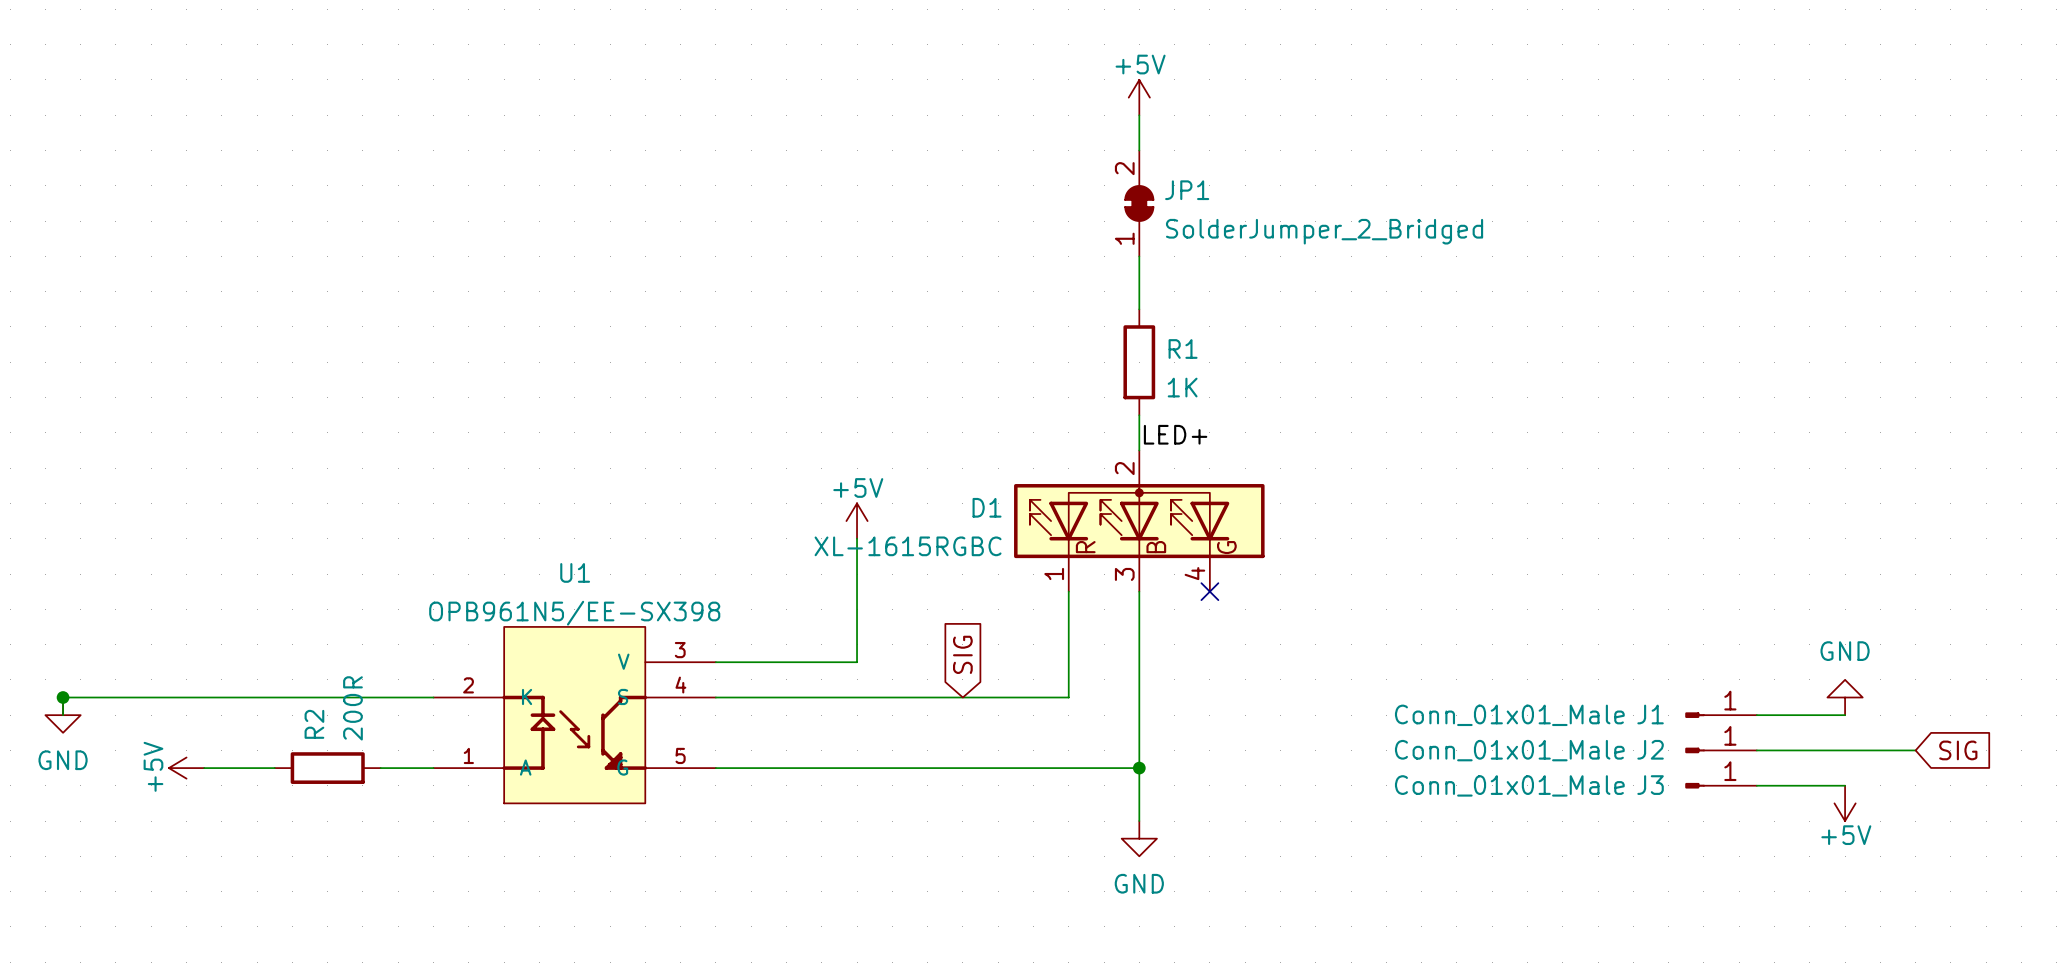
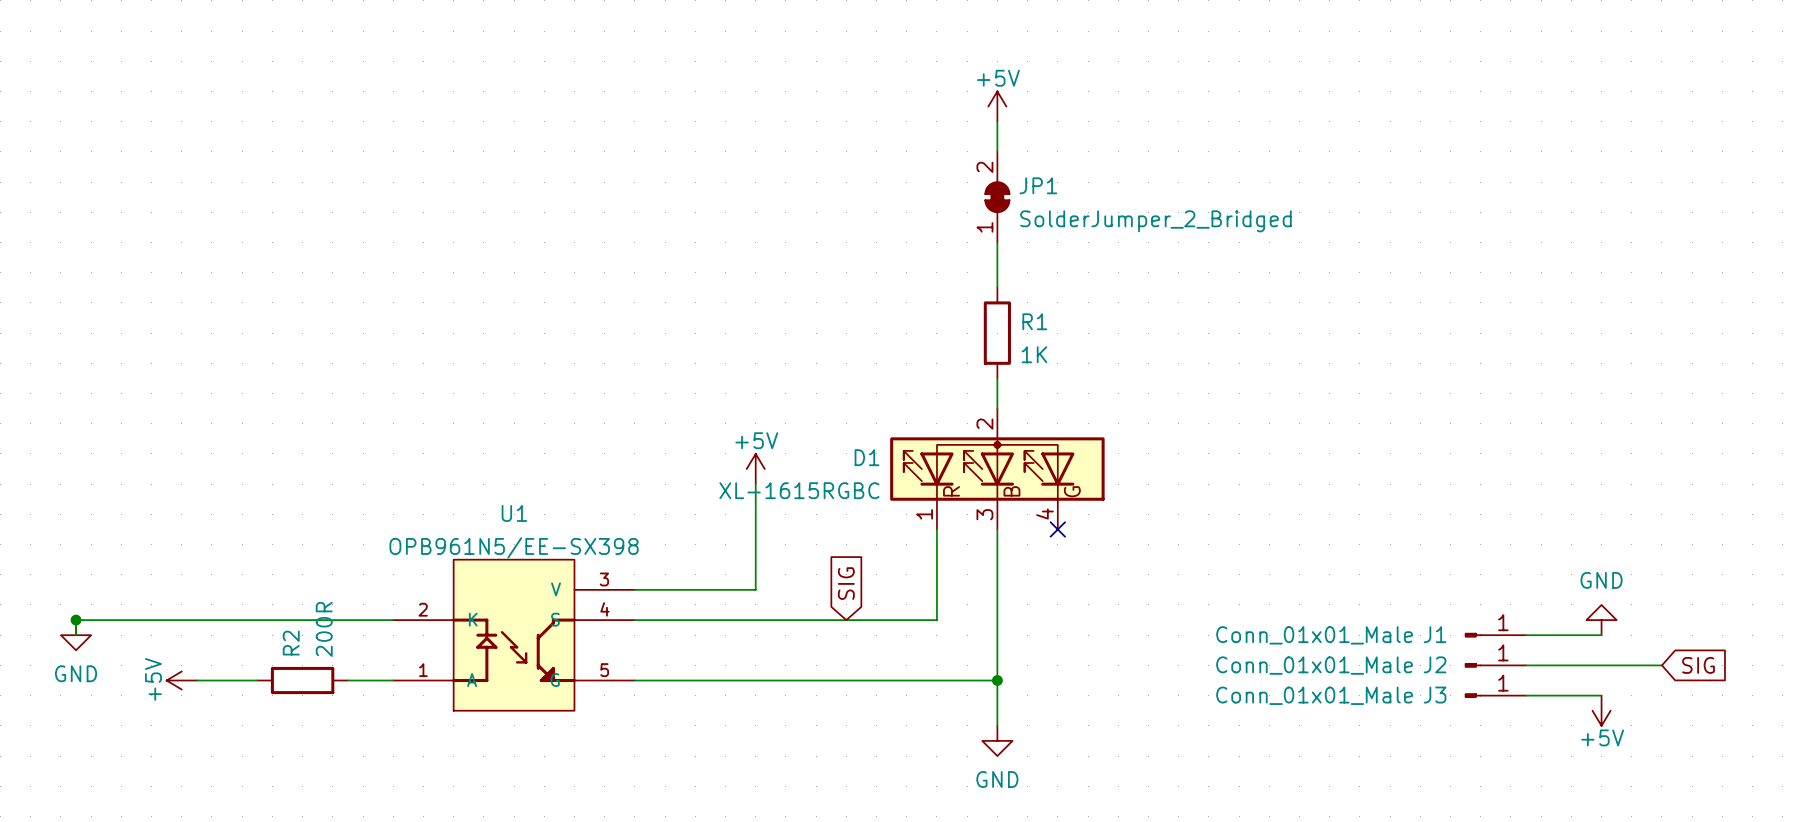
label: LED+ (1175, 434) -> none

